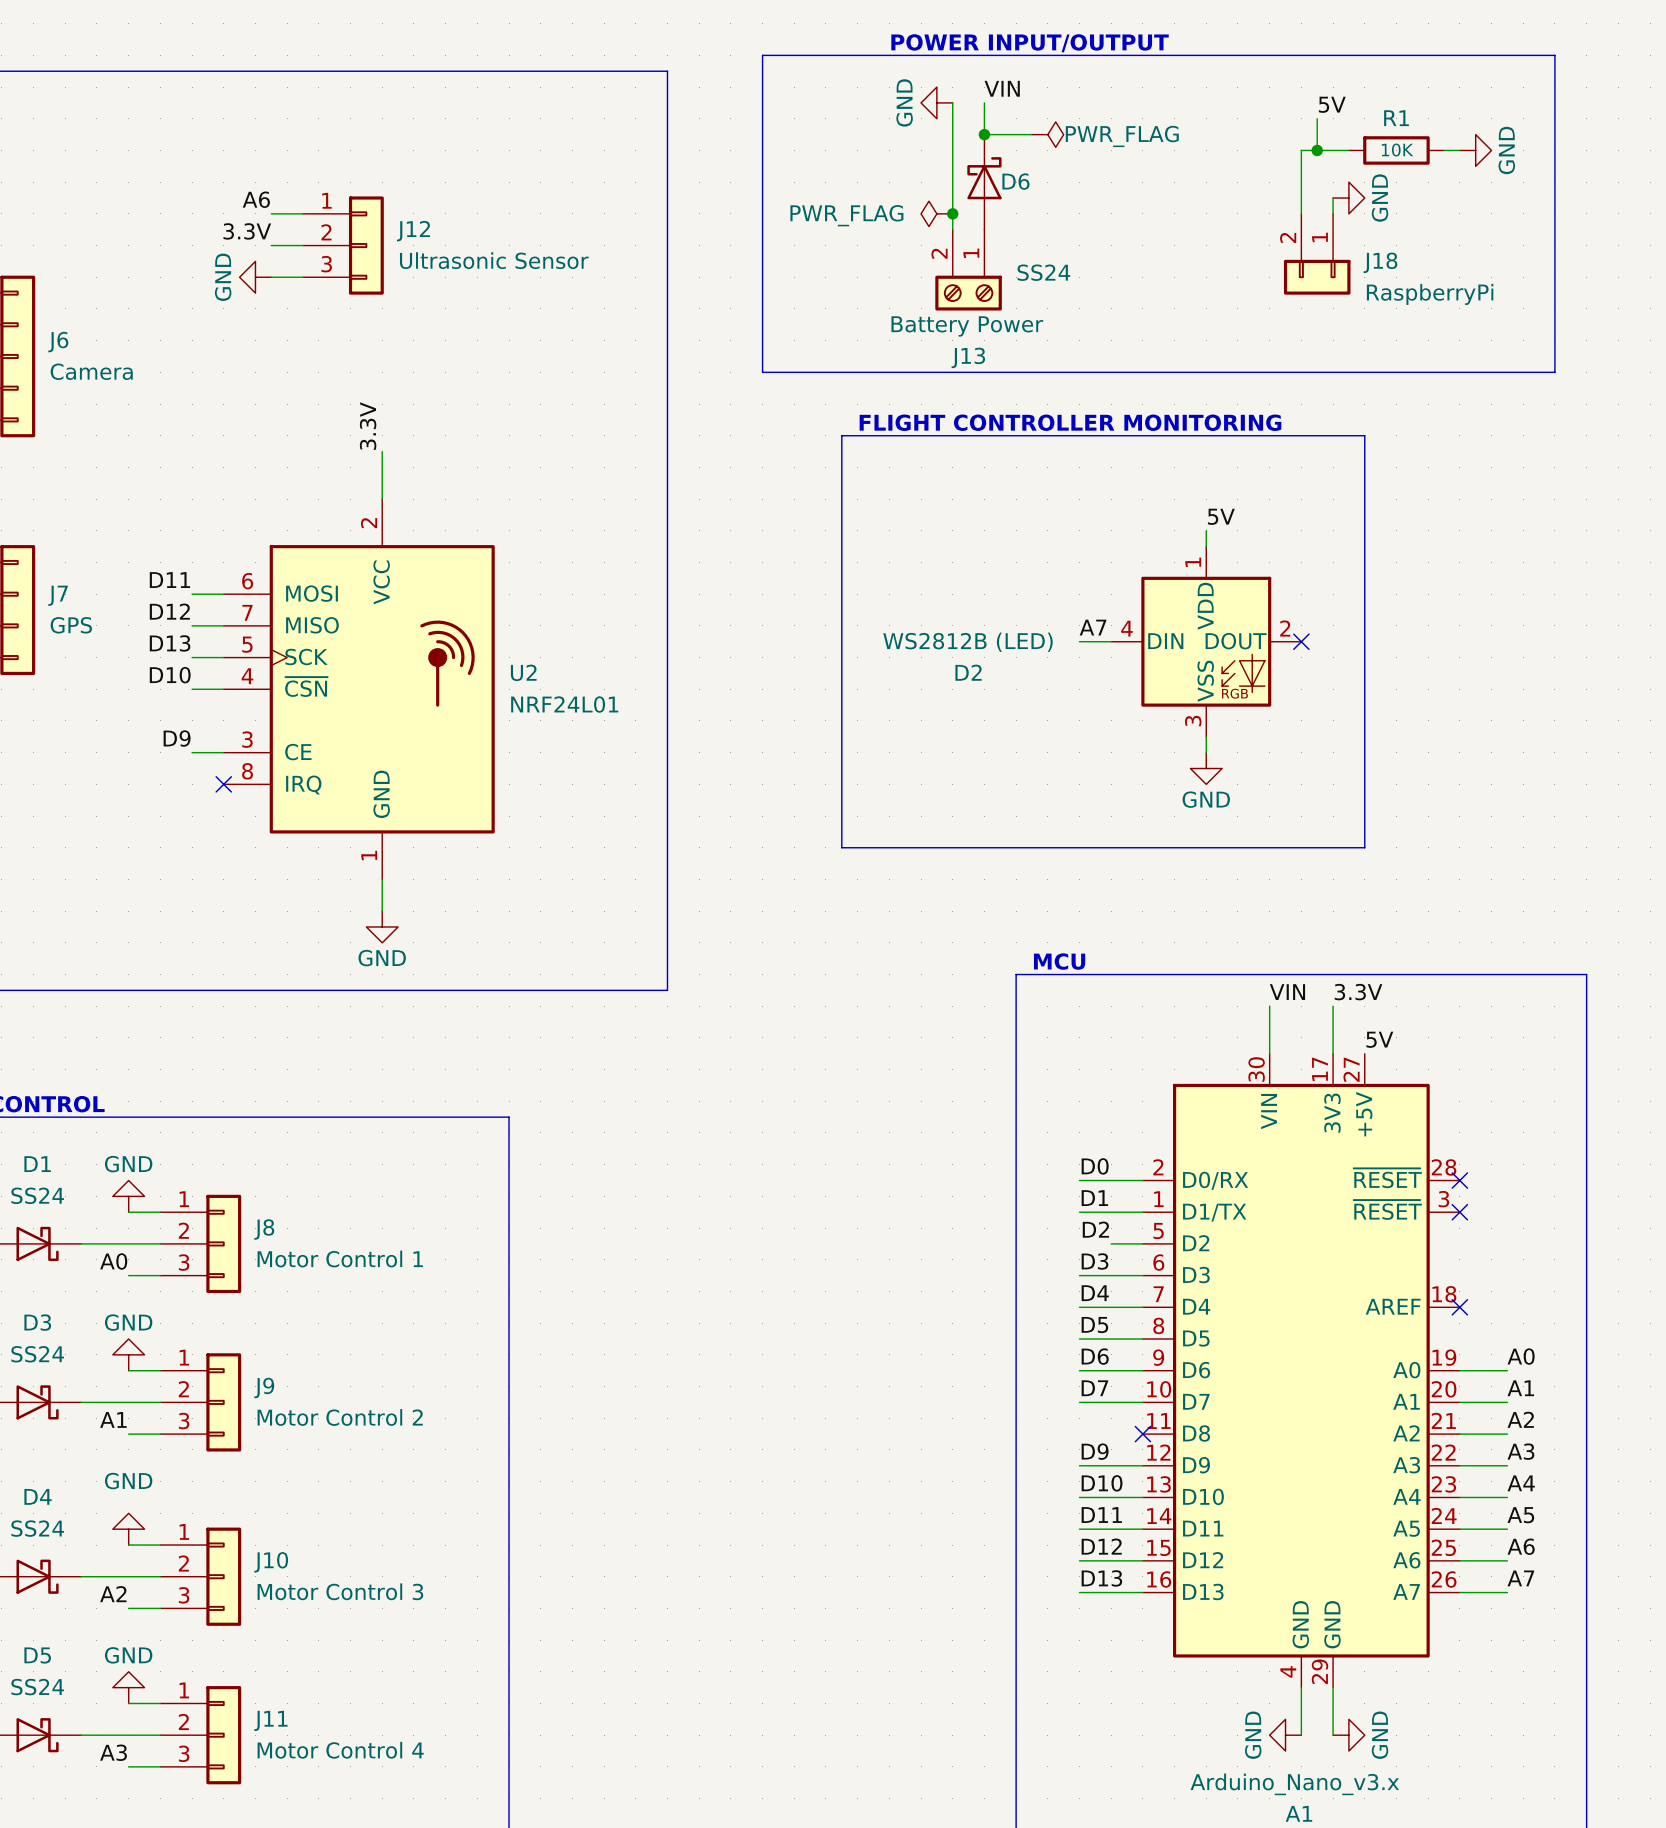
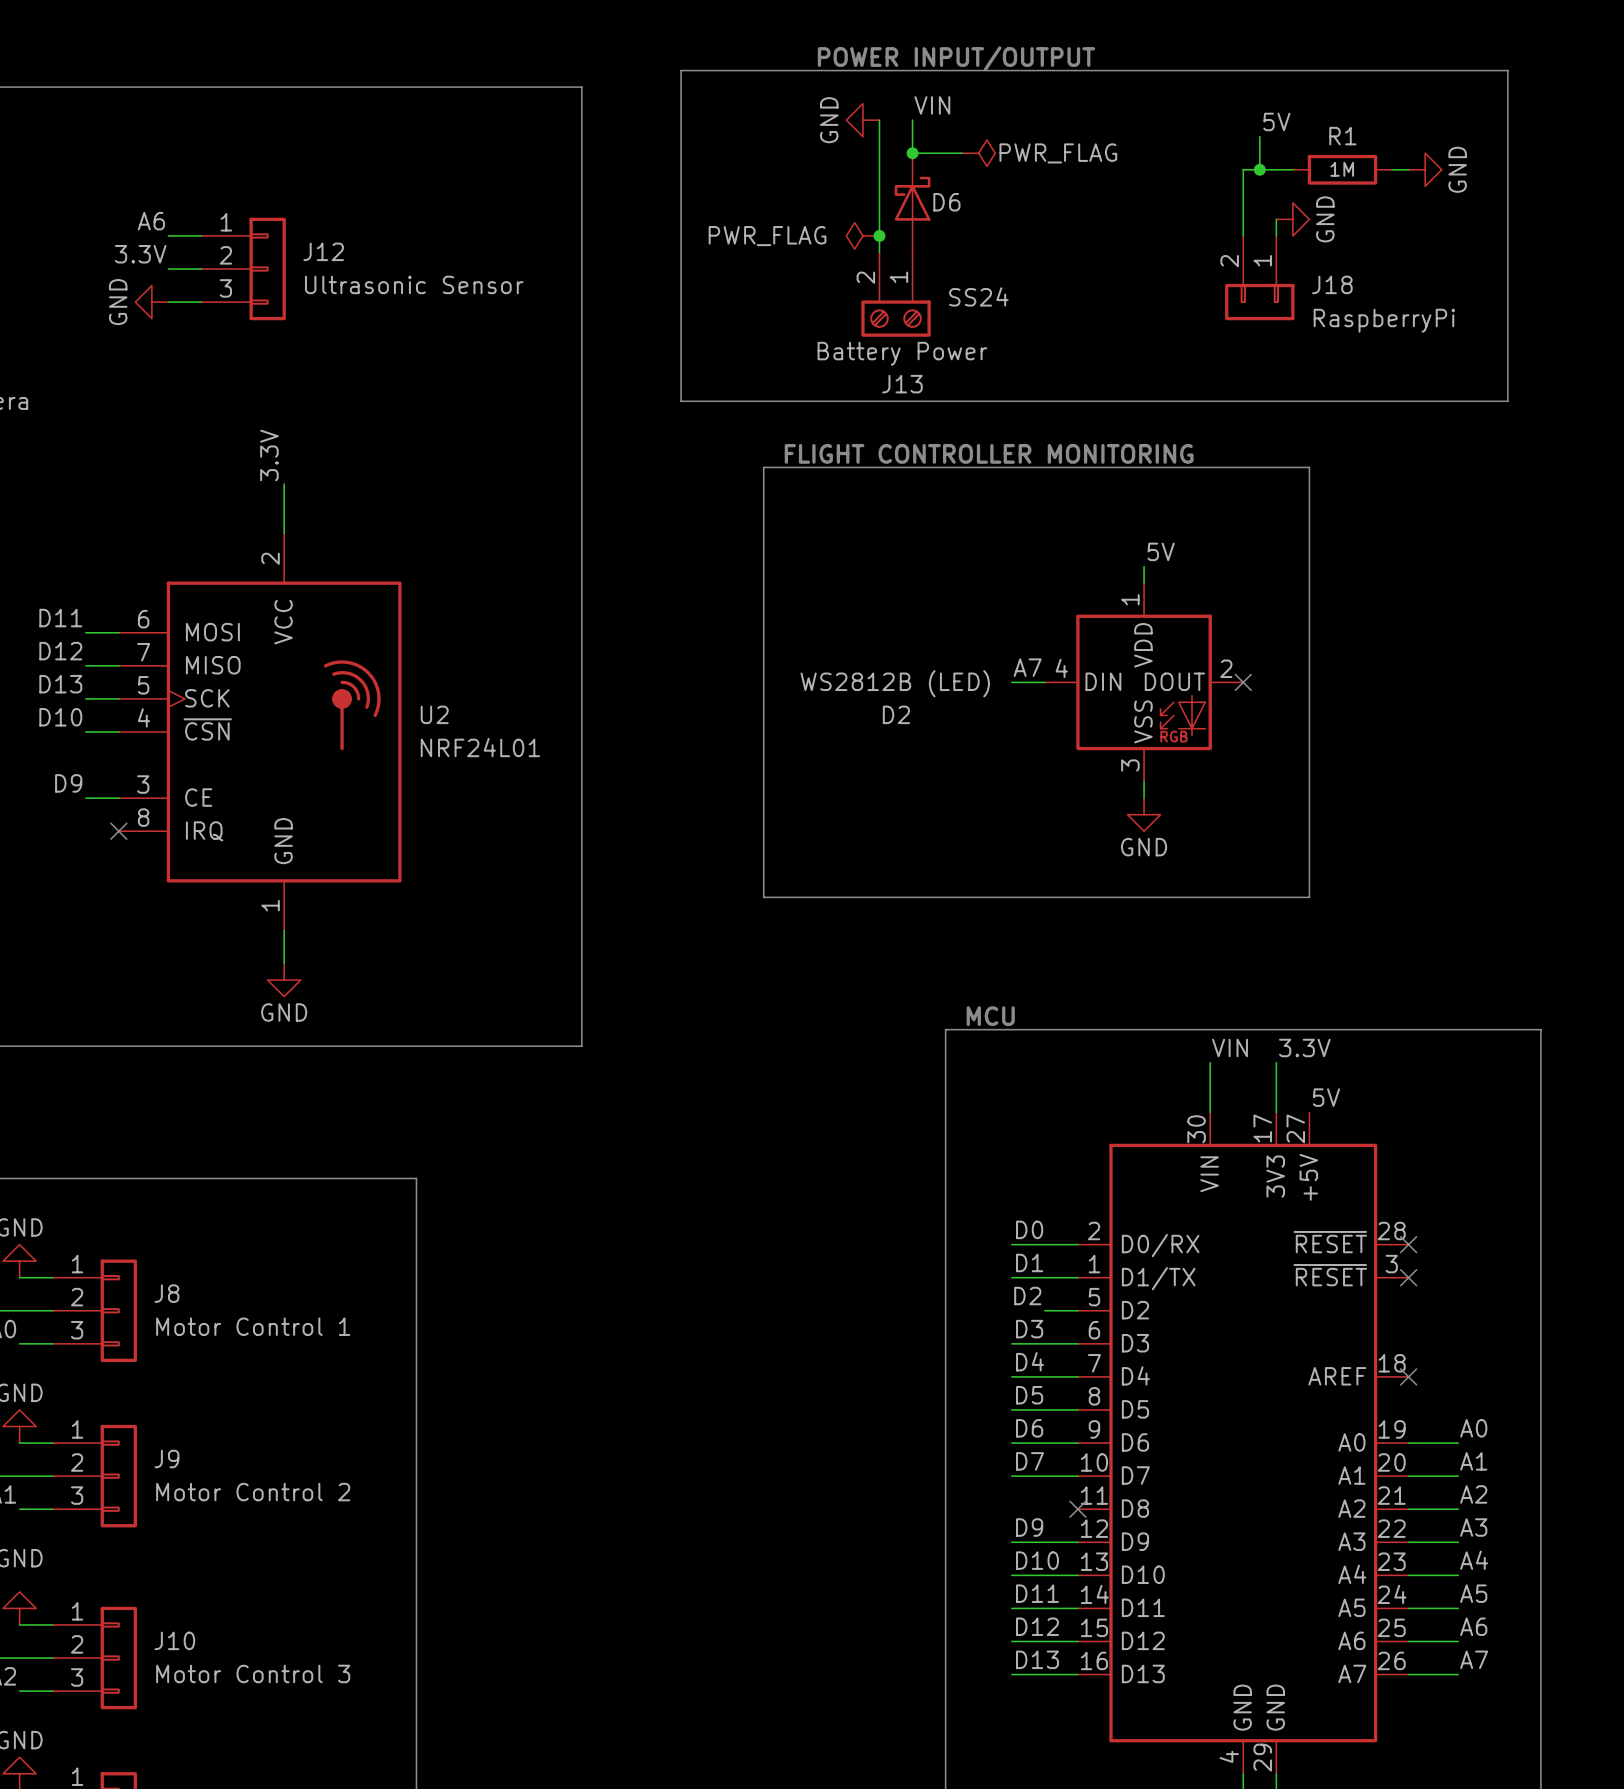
R1 value: 10K (1397, 150) -> 1M (1342, 169)

